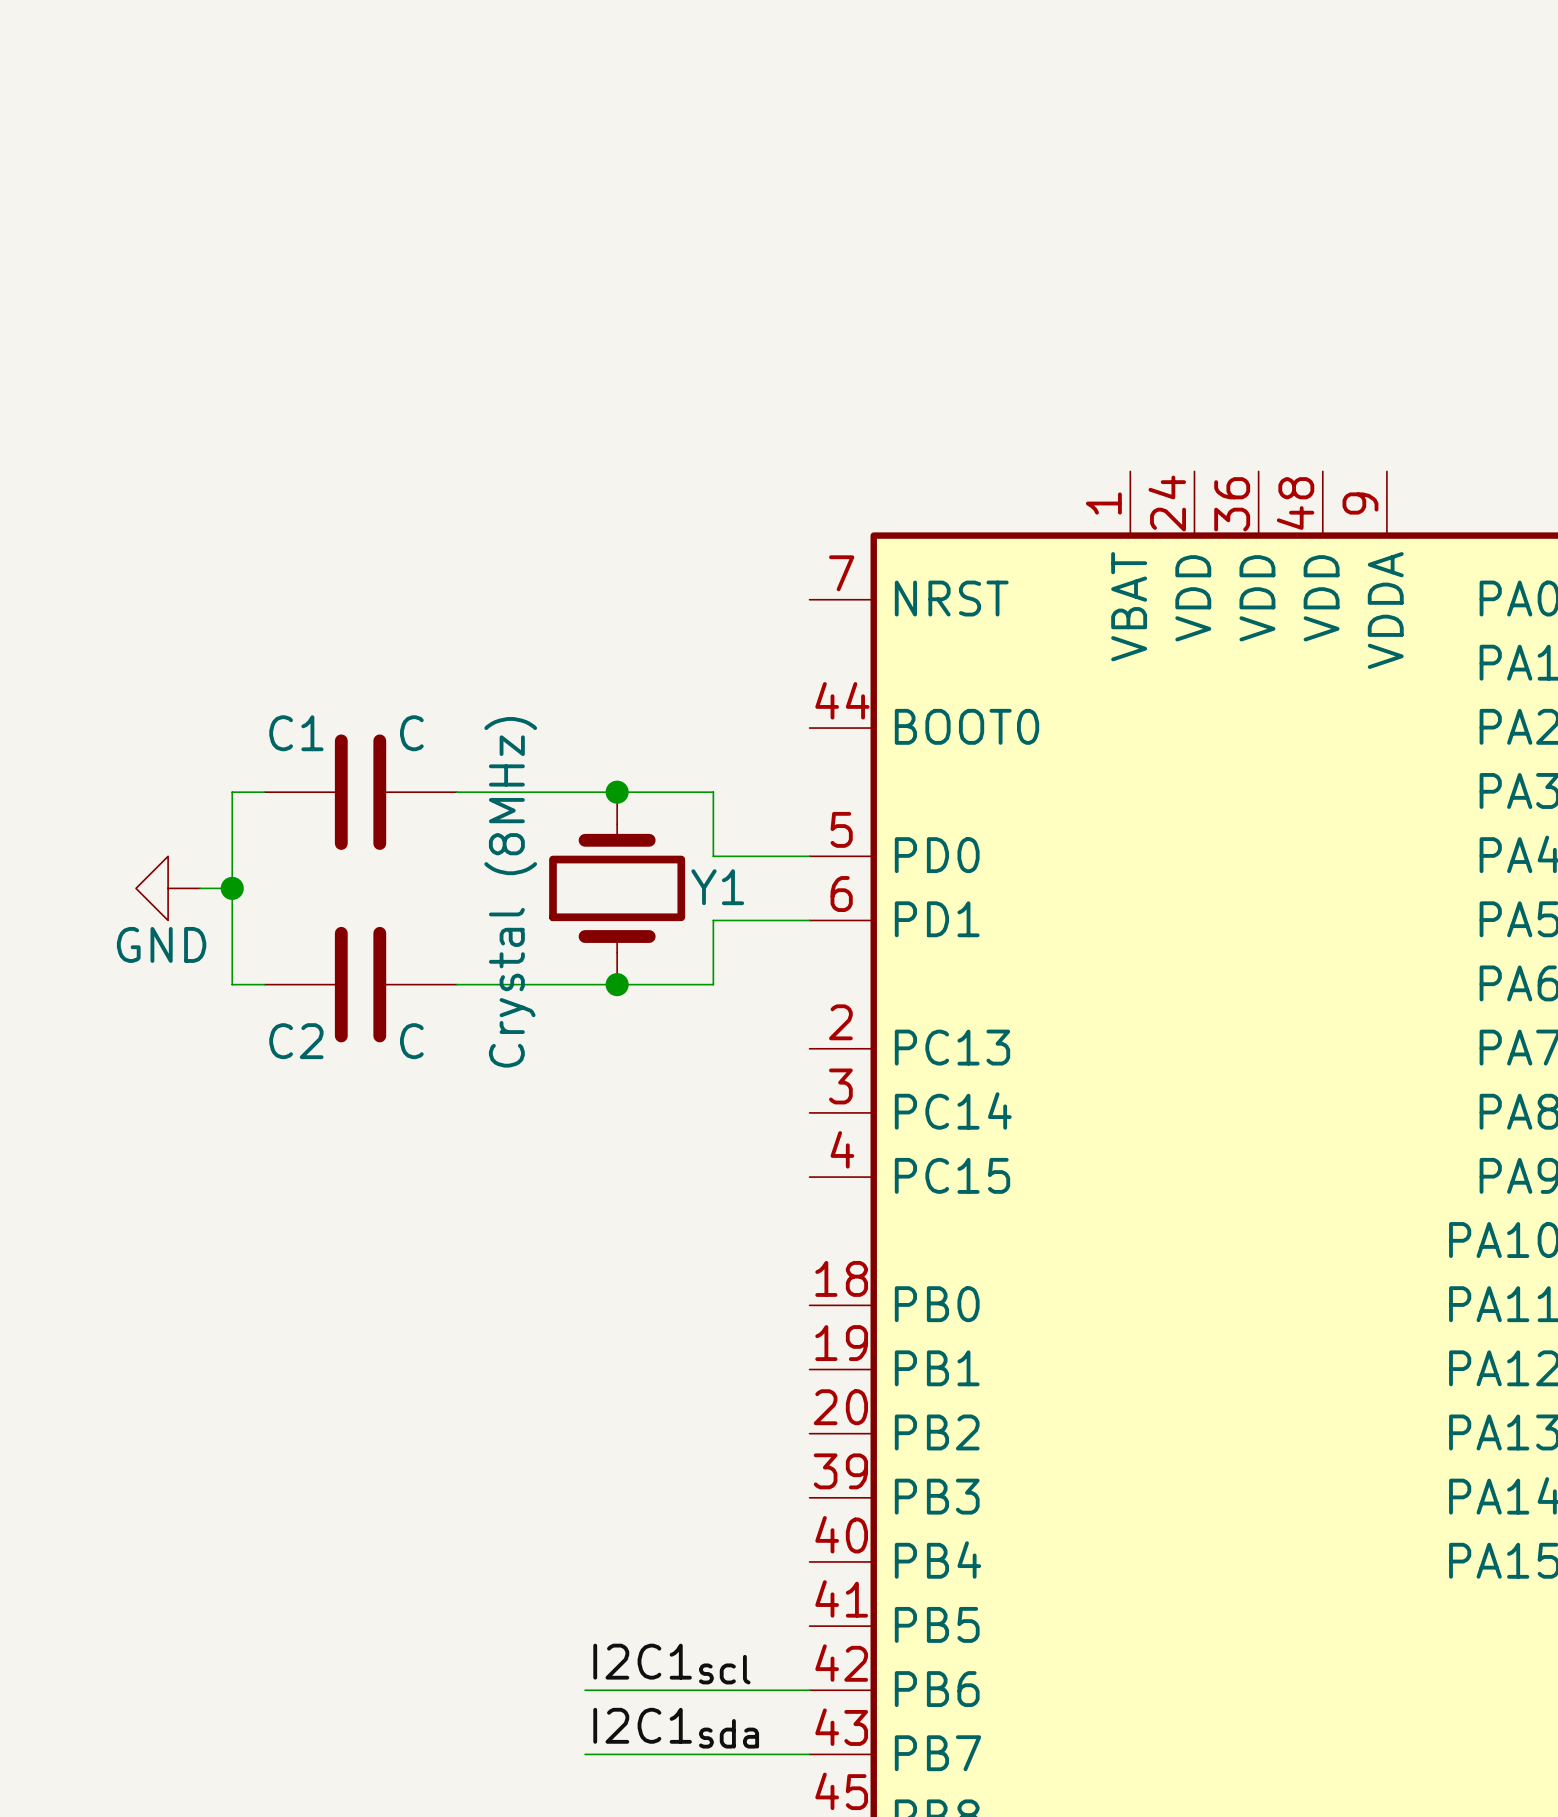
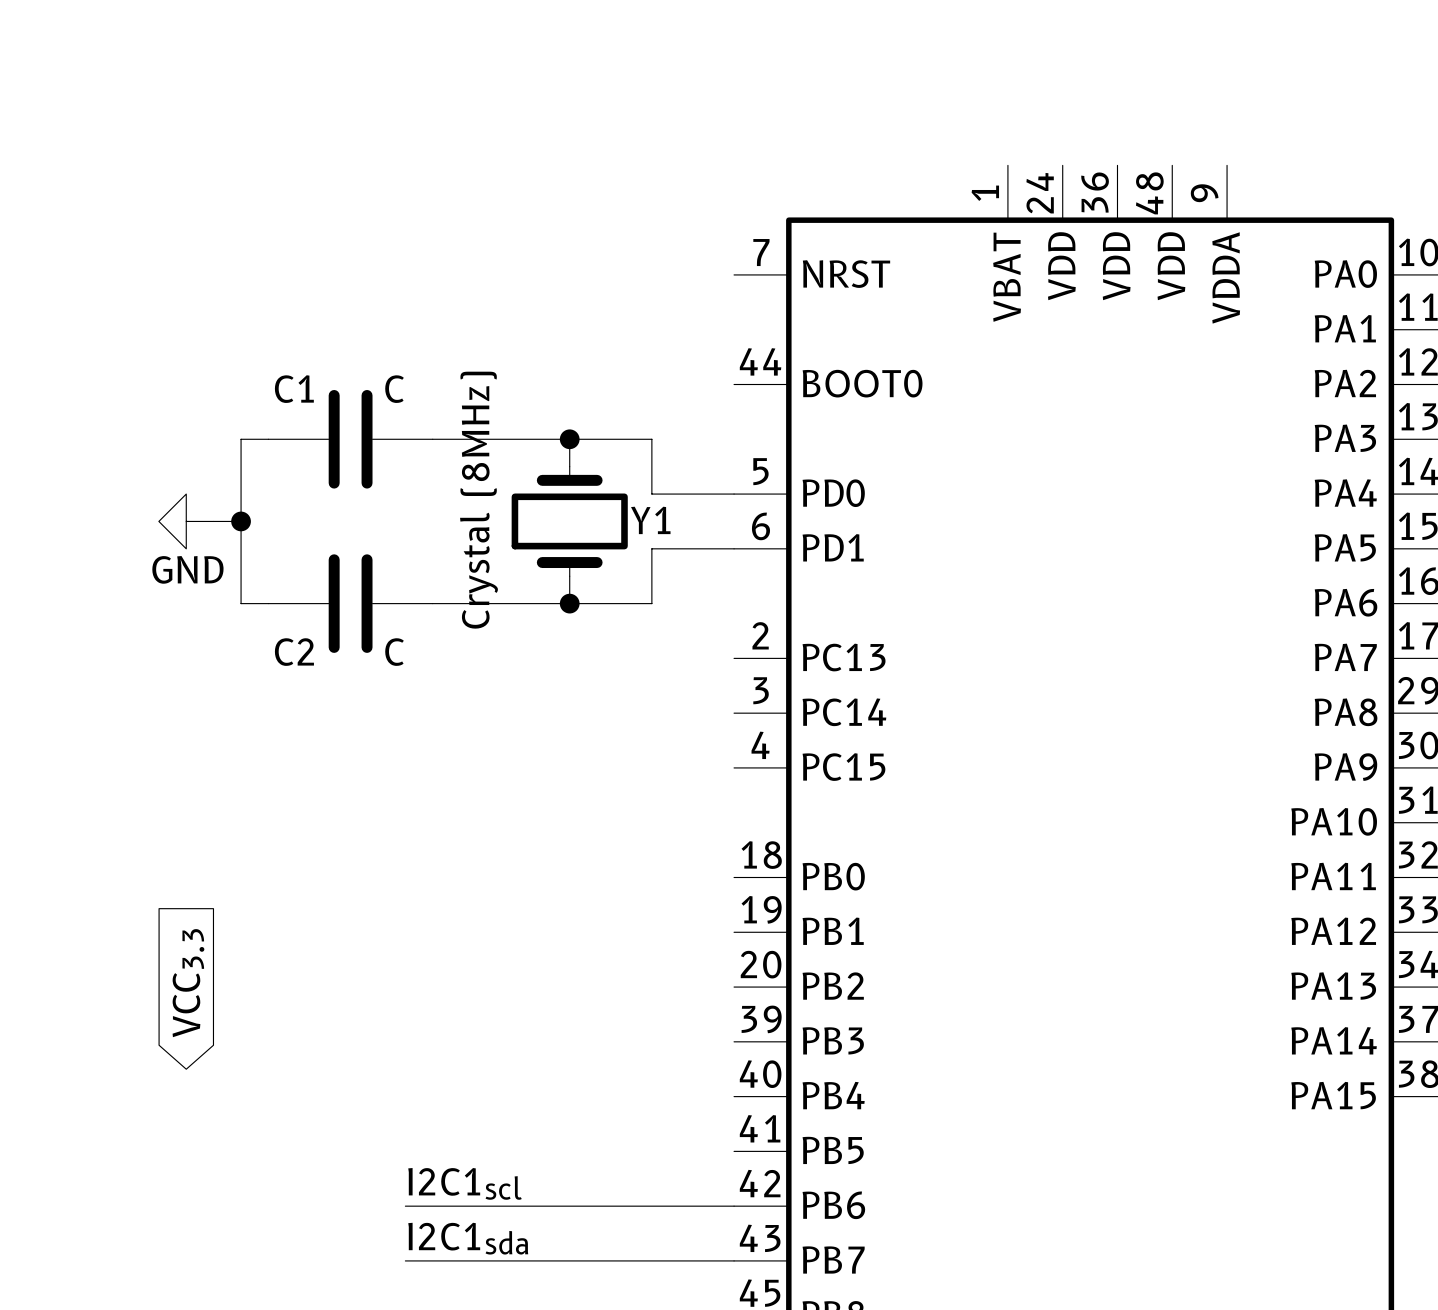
global label: none -> VCC3.3 (188, 983)
label position: I2C1scl (671, 1664) -> I2C1scl (465, 1183)
wire: none -> (405, 1206) (542, 1206)
label position: I2C1sda (676, 1728) -> I2C1sda (468, 1238)
wire: none -> (405, 1260) (542, 1260)

